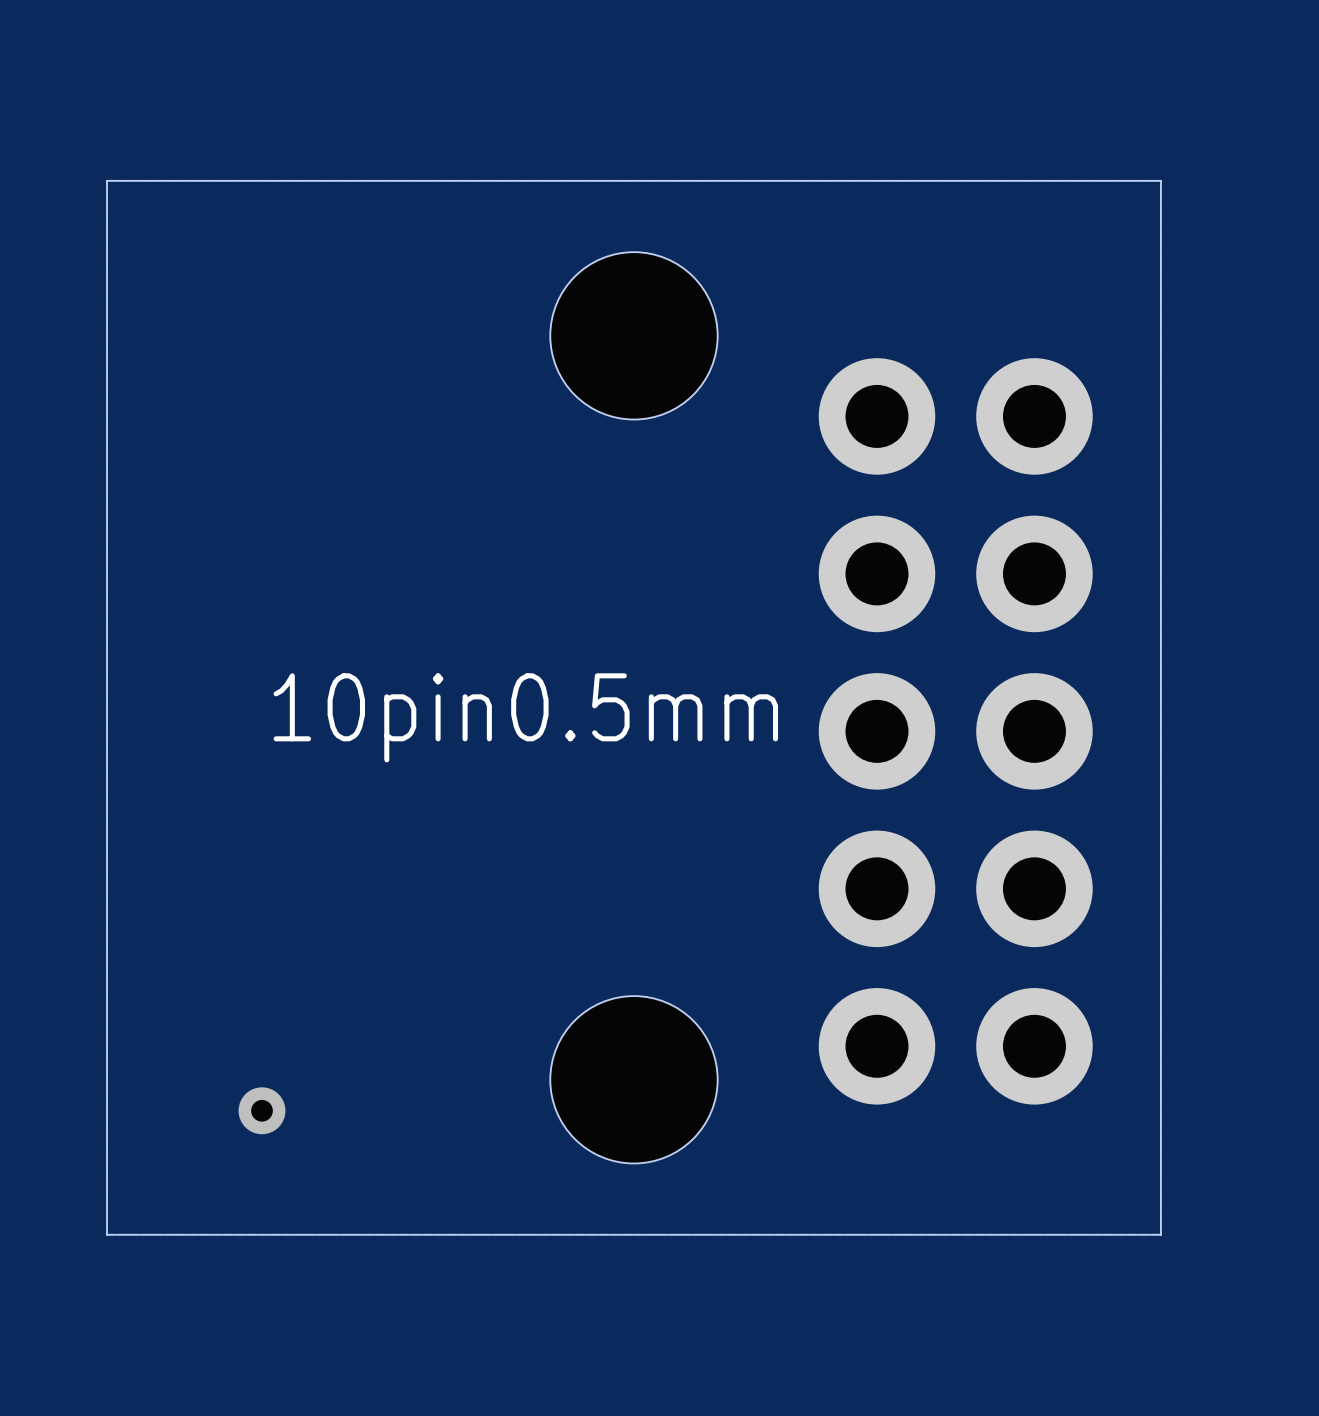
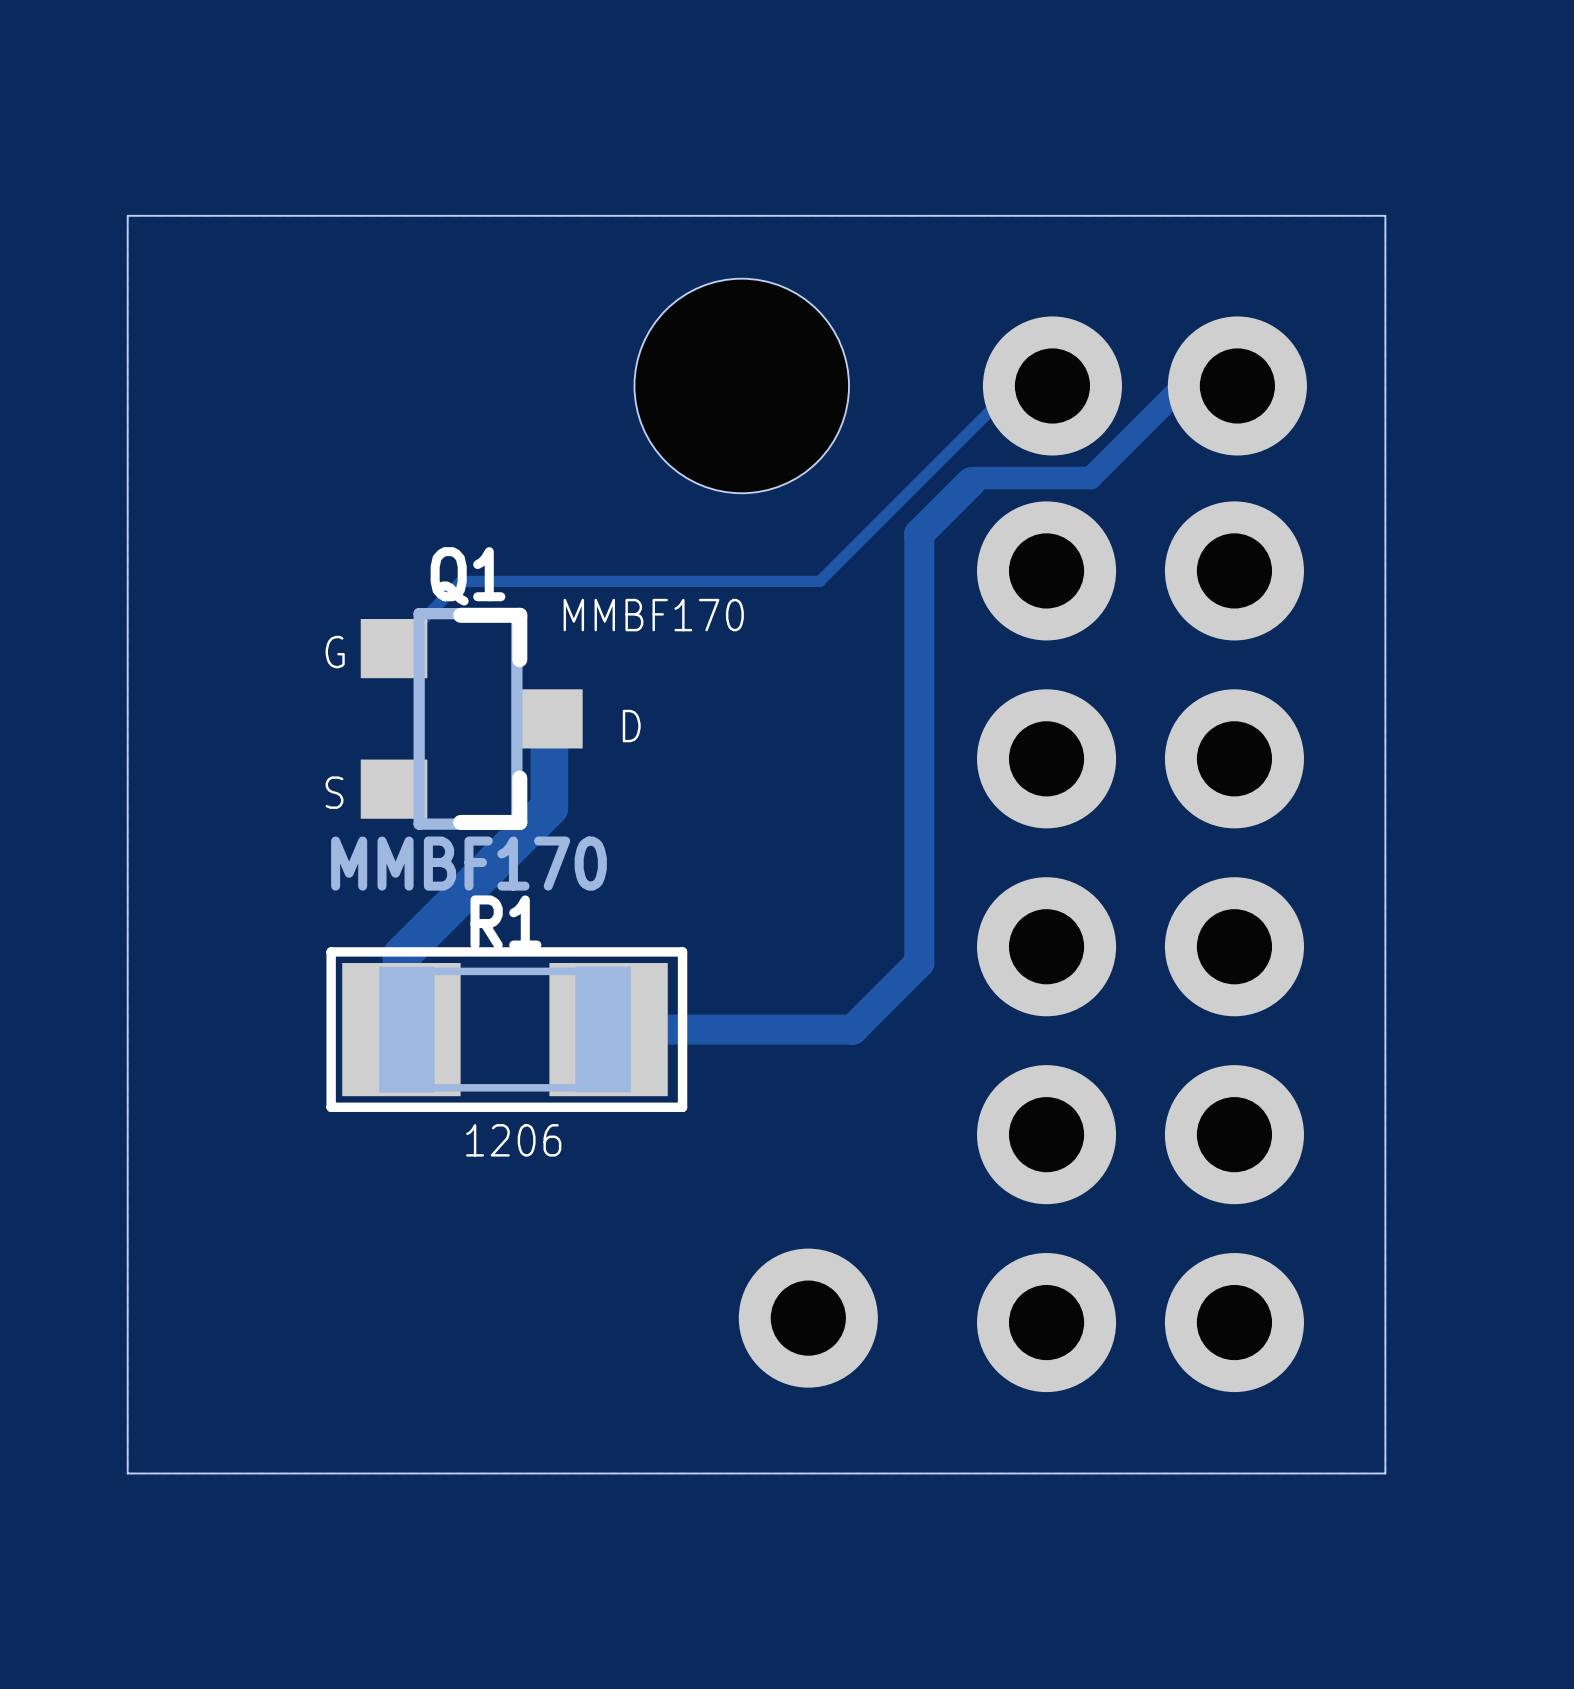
hole size: [550, 252, 718, 420] -> [634, 278, 850, 494]
track: none -> (1052, 385) (1015, 385) (819, 581) (461, 581) (394, 648)
part: none -> (1052, 385)
track: none -> (1237, 385) (1182, 385) (1090, 478) (975, 478) (919, 533) (919, 963) (852, 1029) (608, 1029)
part: none -> (1237, 385)
text: none -> MMBF170 (653, 615)
text: none -> G (335, 652)
Q1: none -> MMBF170 (471, 718)
track: none -> (549, 718) (549, 807) (401, 955) (401, 1029)
text: none -> D (631, 726)
text: none -> S (334, 792)
text: 10pin0.5mm (525, 717) -> none
part position: (955, 731) -> (1140, 946)
R1: none -> (506, 1029)
text: none -> 1206 (513, 1140)
hole: (633, 1079) -> none
part: none -> (808, 1318)
via: (262, 1110) -> none

